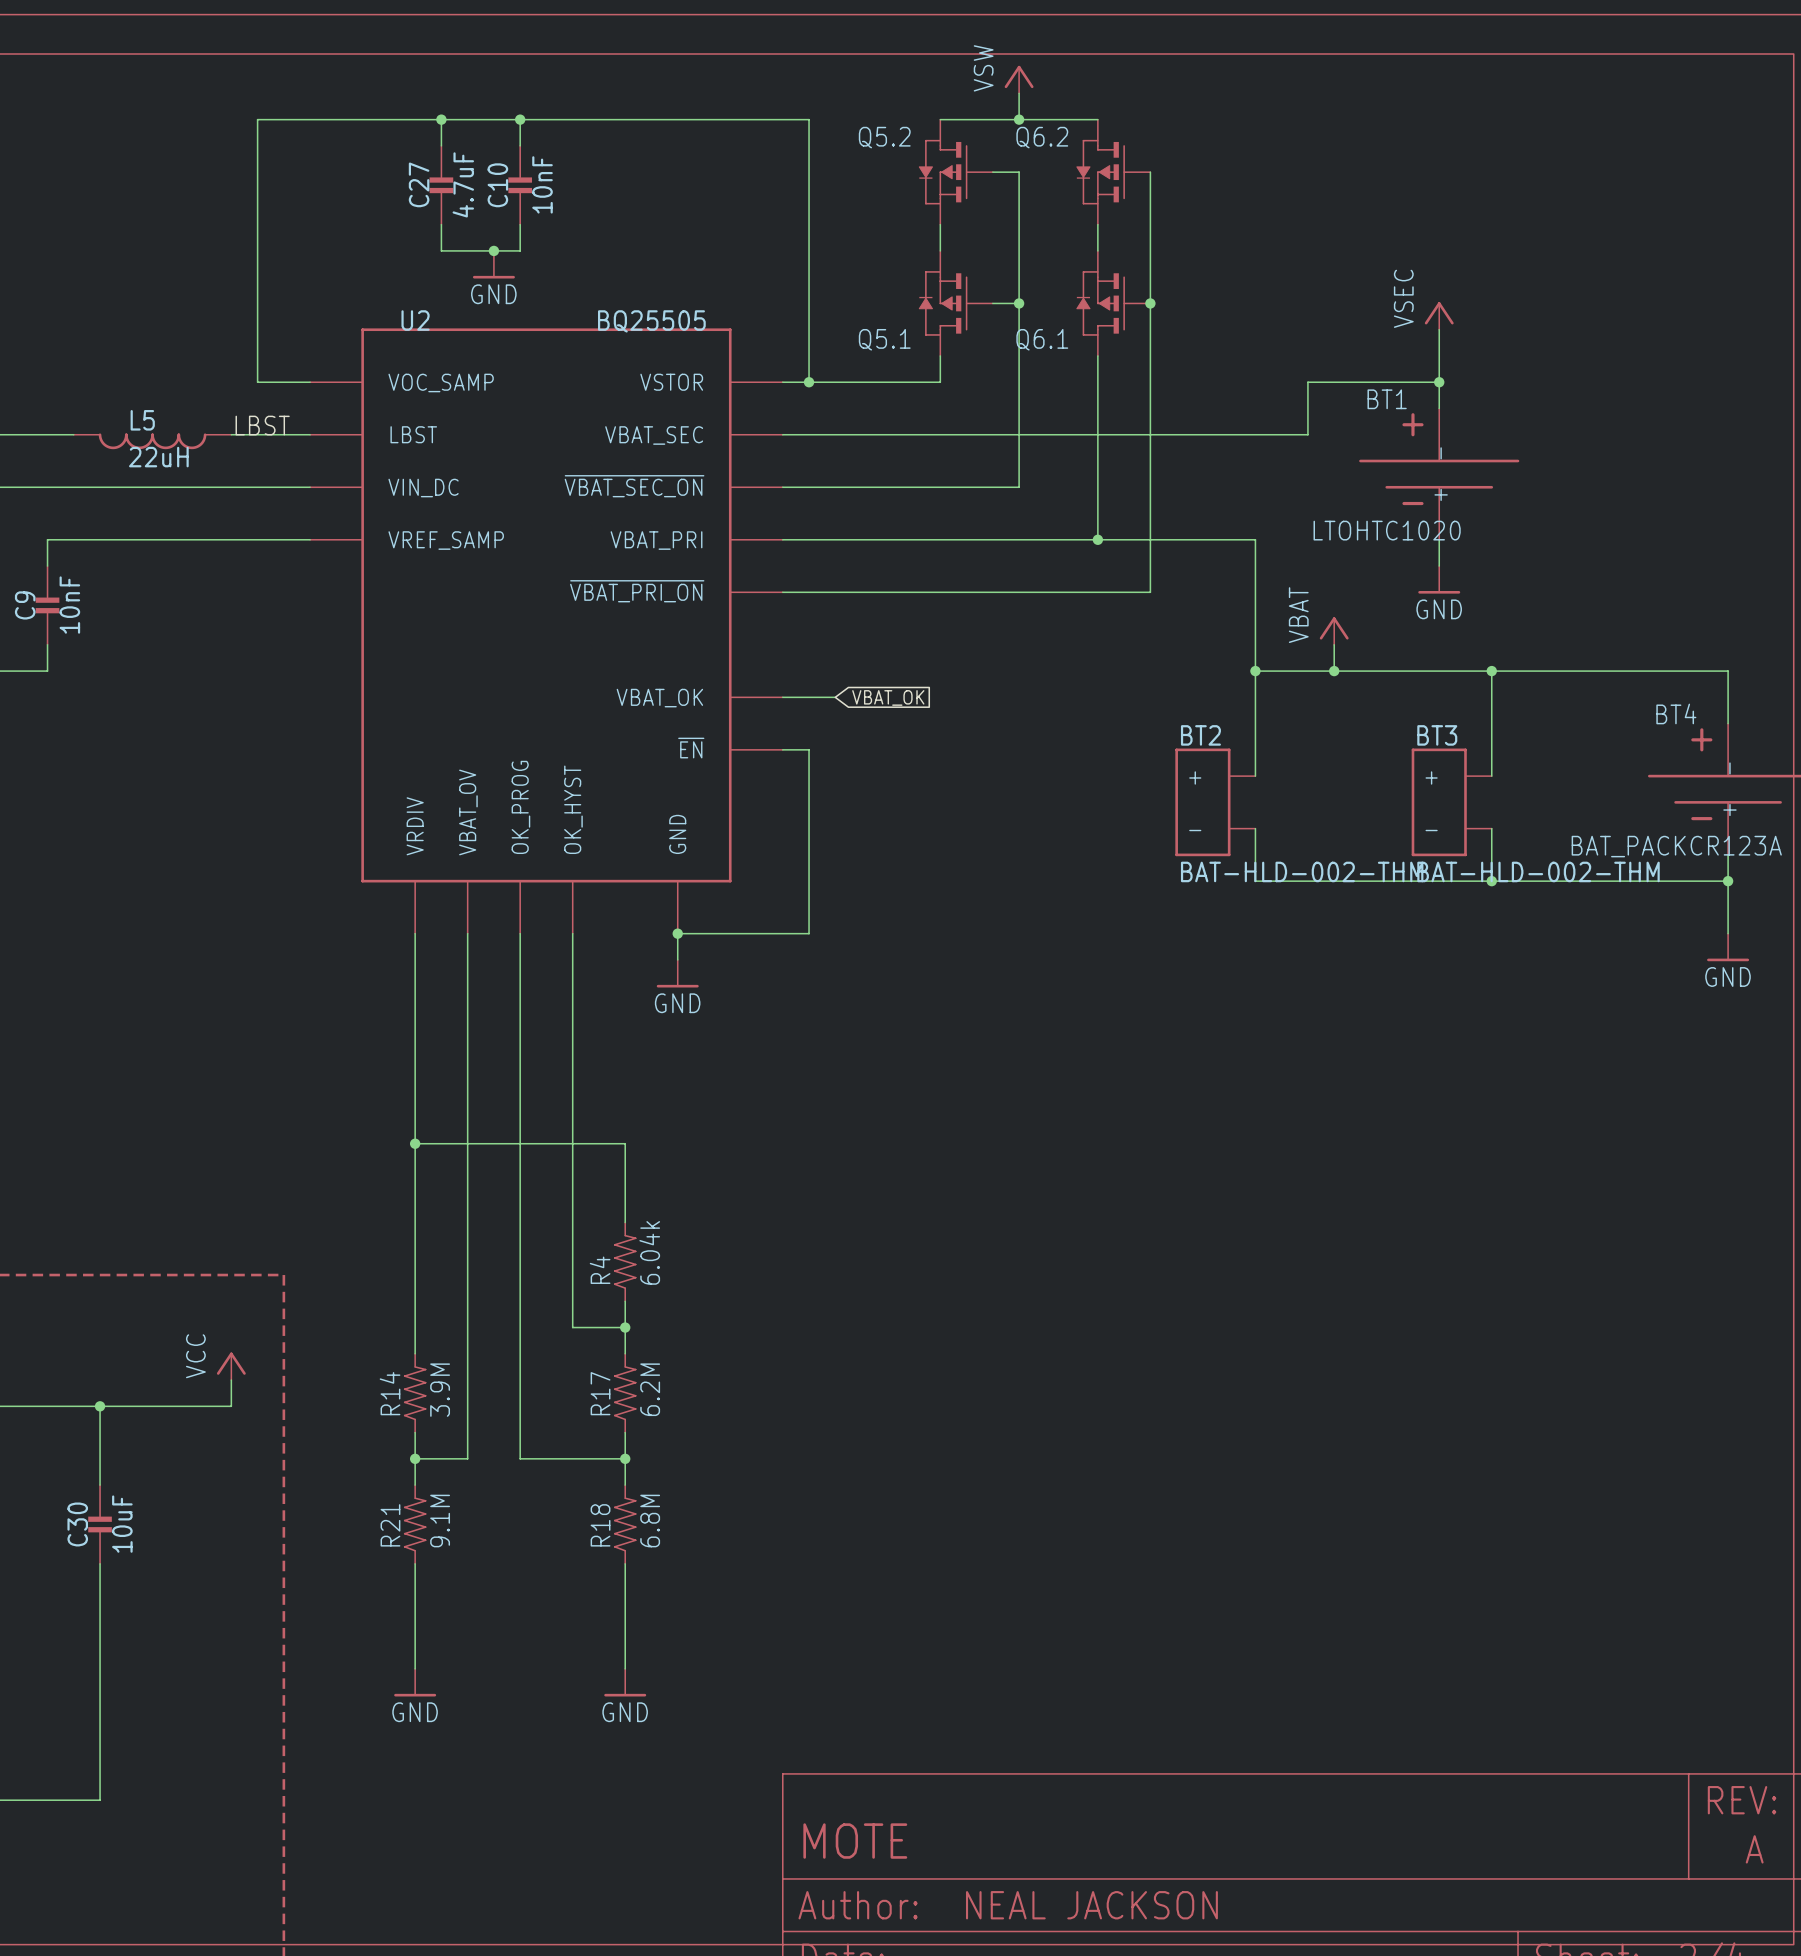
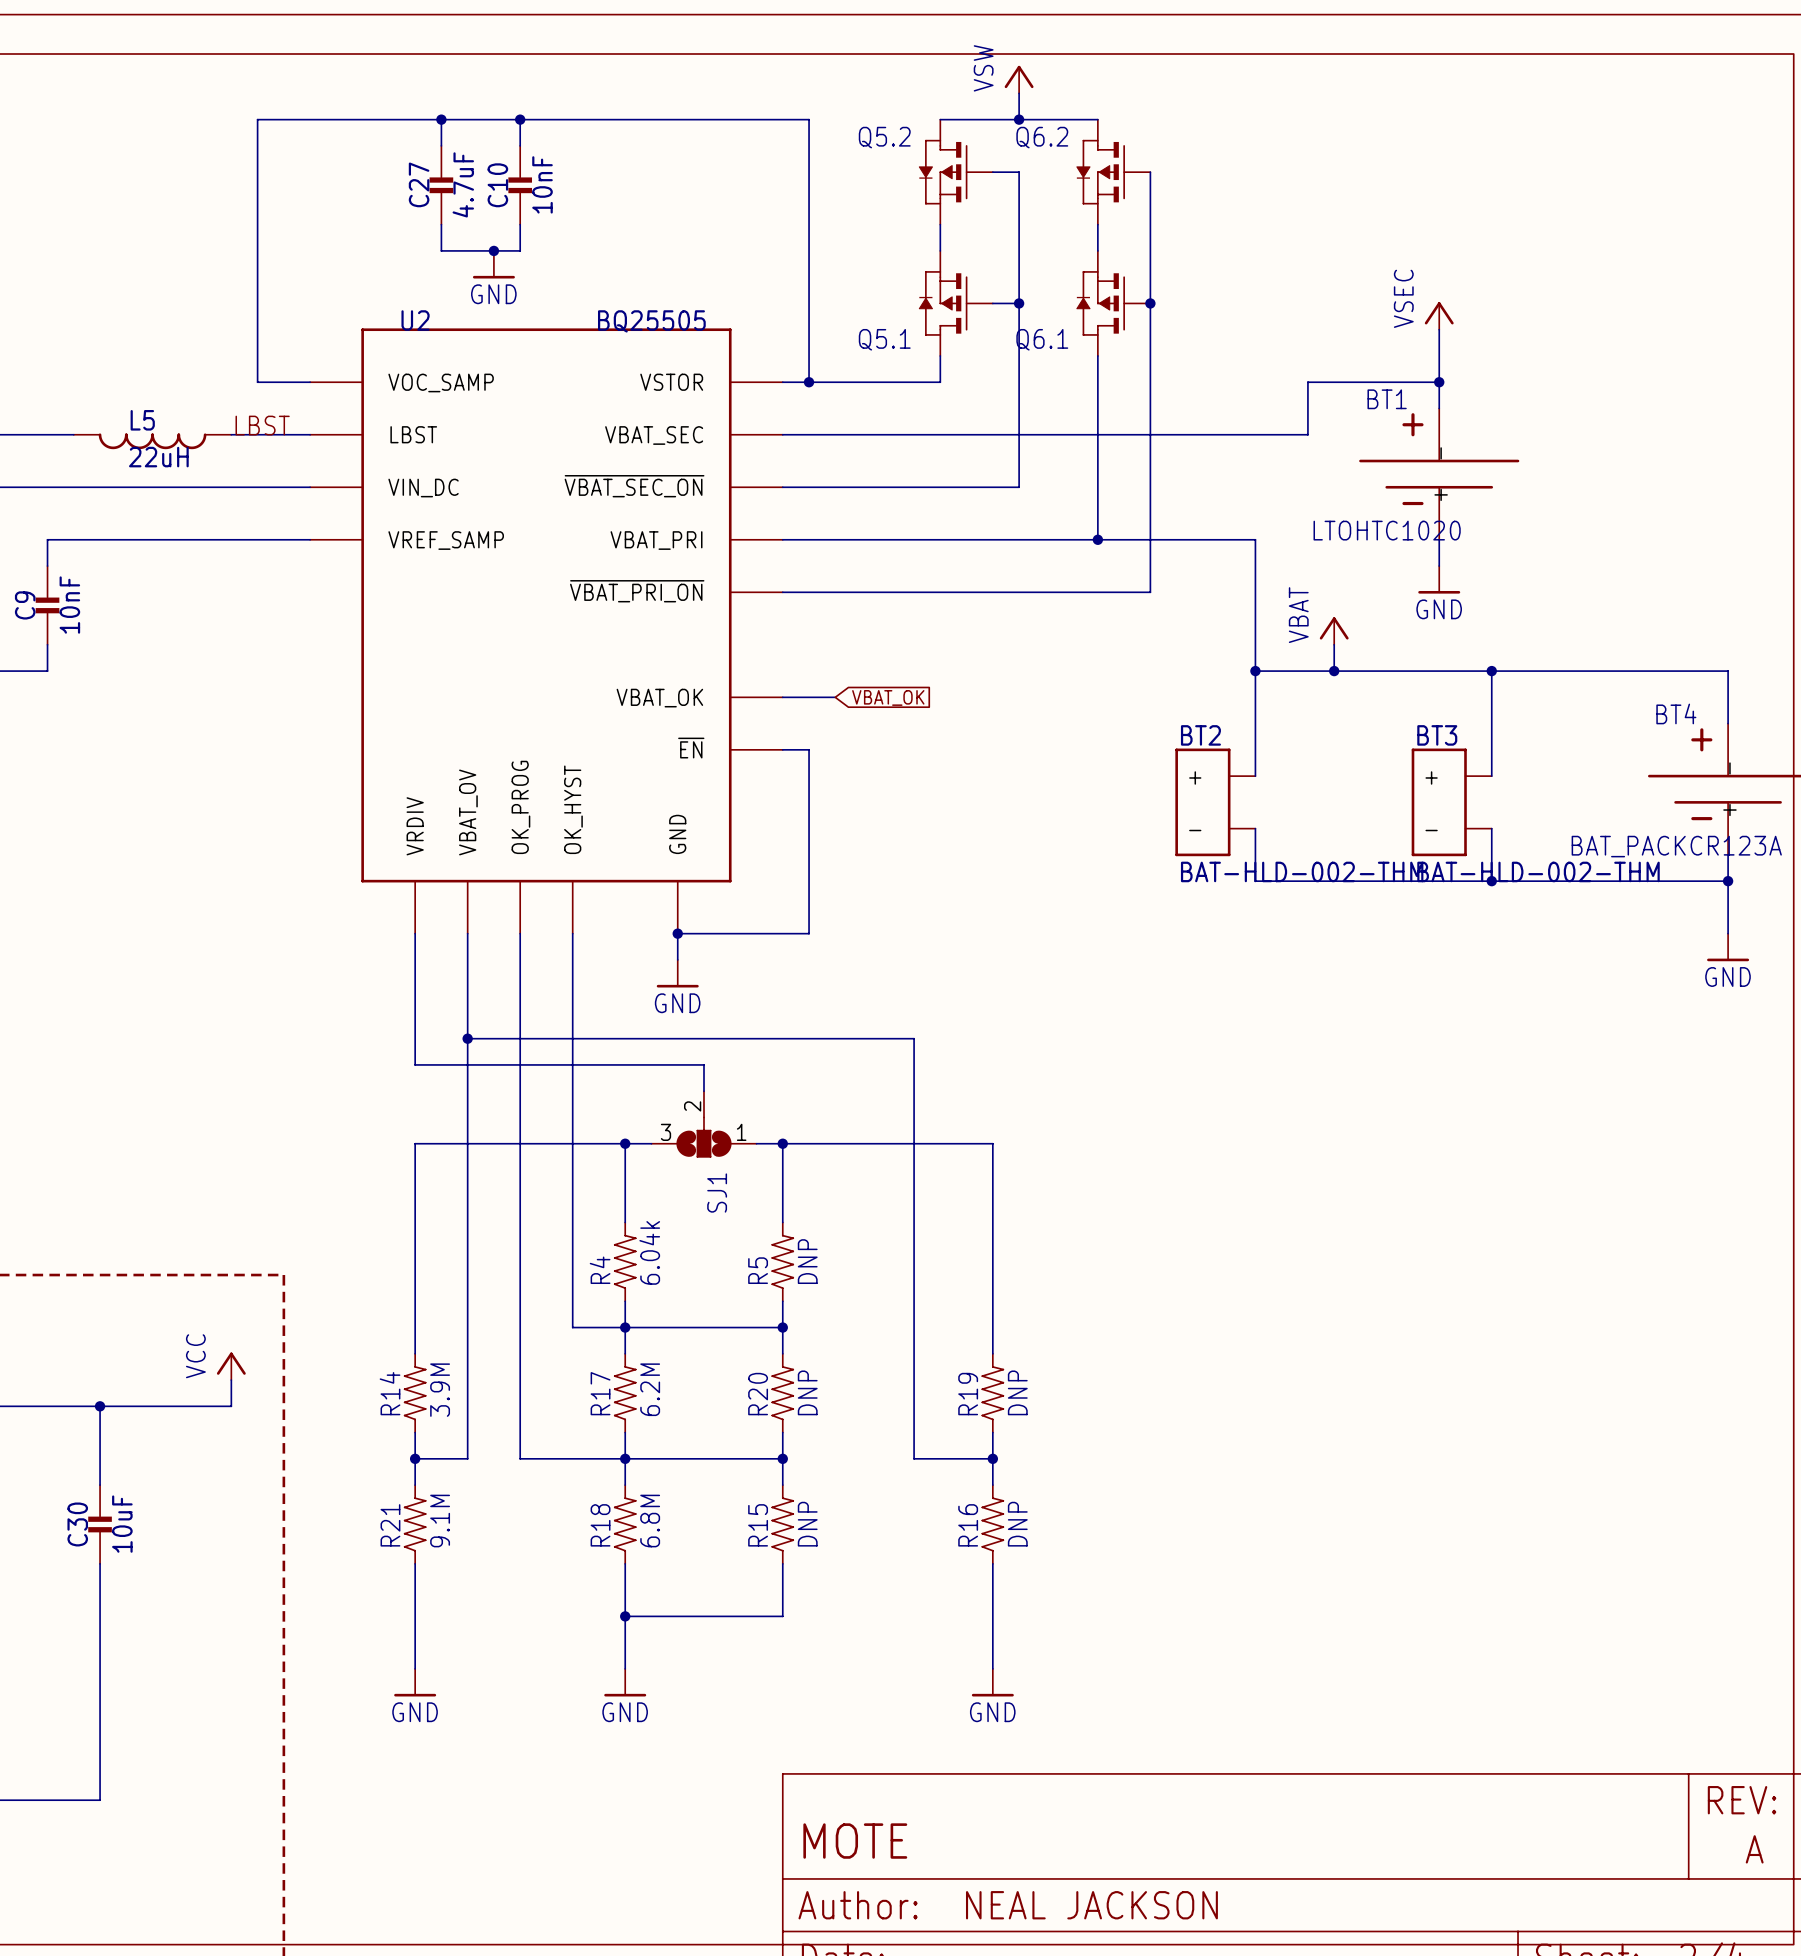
wire: none -> (467, 1038) (914, 1038) (914, 1458) (992, 1458)
junction: none -> (467, 1038)
wire: (415, 1064) (415, 1143) -> (415, 1064) (703, 1064) (703, 1091)
SJ1: none -> (703, 1124)
junction: (415, 1143) -> none
wire: none -> (625, 1143) (651, 1143)
junction: none -> (625, 1143)
wire: none -> (756, 1143) (992, 1143) (992, 1353)
wire: none -> (782, 1143) (782, 1222)
junction: none -> (782, 1143)
R5: none -> DNP (782, 1261)
wire: none -> (782, 1301) (782, 1353)
wire: none -> (625, 1327) (782, 1327)
junction: none -> (782, 1327)
R20: none -> DNP (782, 1393)
R19: none -> DNP (992, 1393)
wire: none -> (782, 1432) (782, 1485)
wire: none -> (992, 1432) (992, 1485)
wire: none -> (625, 1458) (782, 1458)
junction: none -> (782, 1458)
junction: none -> (992, 1458)
R15: none -> DNP (782, 1524)
R16: none -> DNP (992, 1524)
wire: none -> (782, 1563) (782, 1616) (625, 1616)
wire: none -> (992, 1563) (992, 1668)
junction: none -> (625, 1616)
power symbol: none -> GND (992, 1682)

